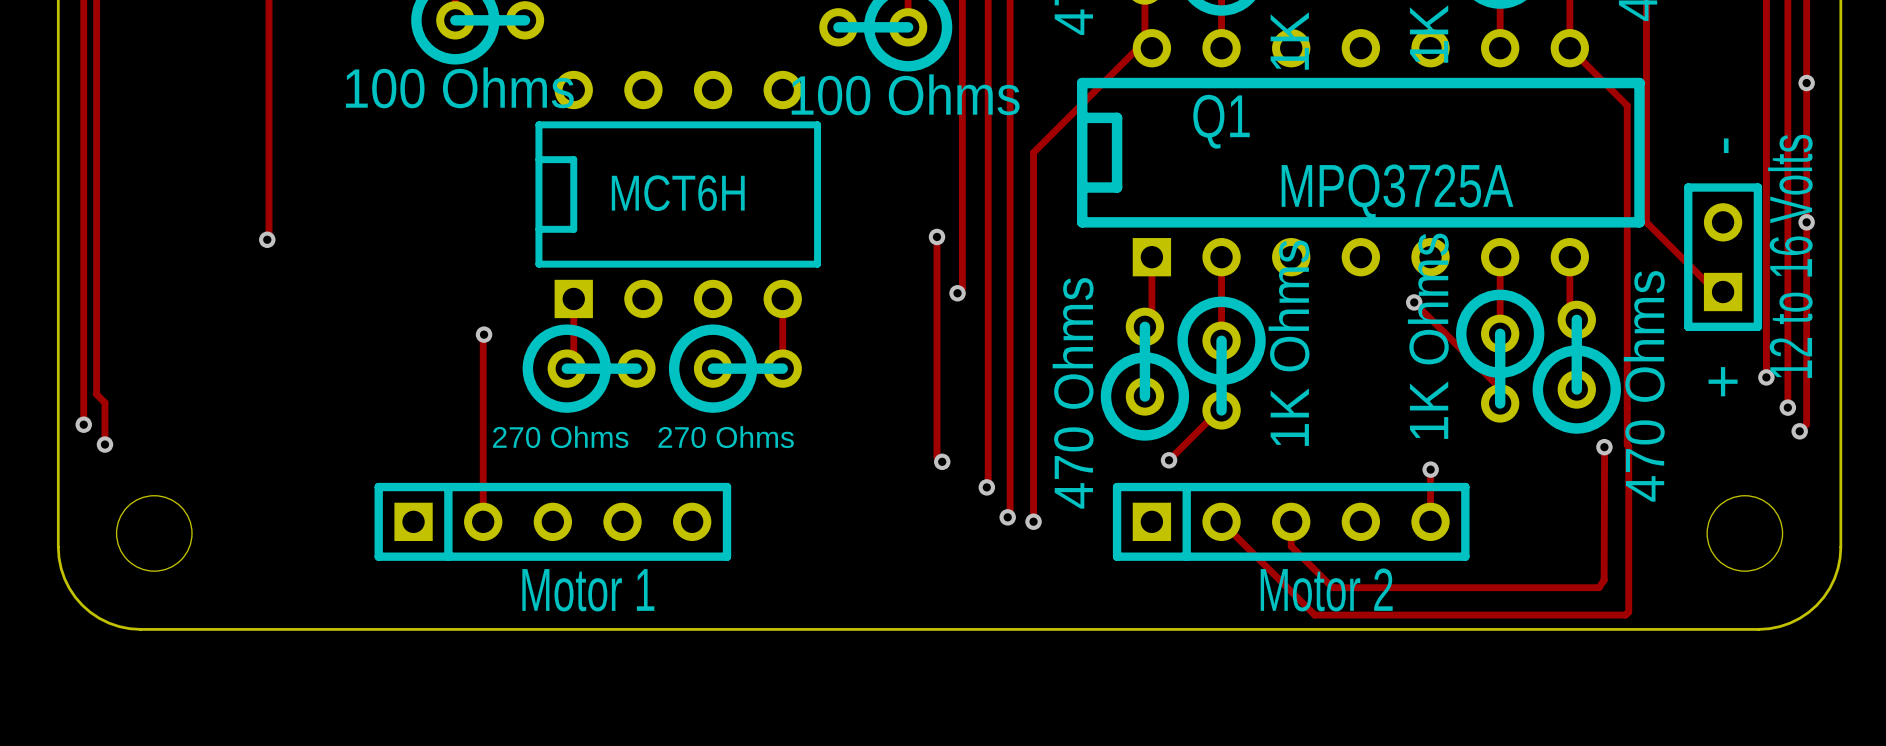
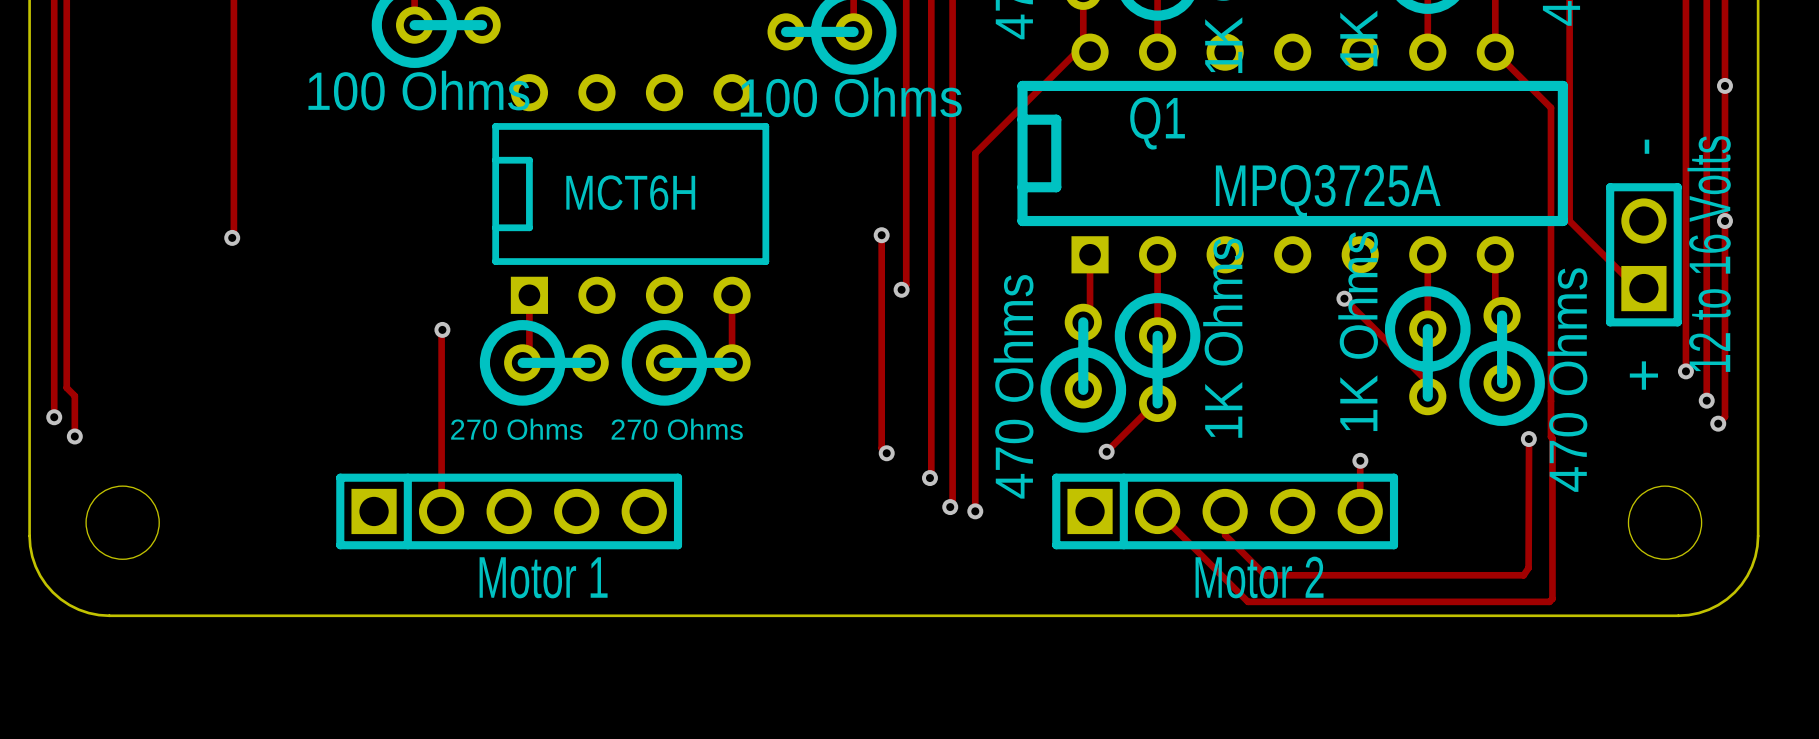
part footprint: [1684, 183, 1763, 332] -> [1606, 183, 1682, 327]
part footprint: [374, 482, 732, 561] -> [336, 473, 683, 550]
part footprint: [1112, 482, 1470, 561] -> [1052, 473, 1399, 550]

